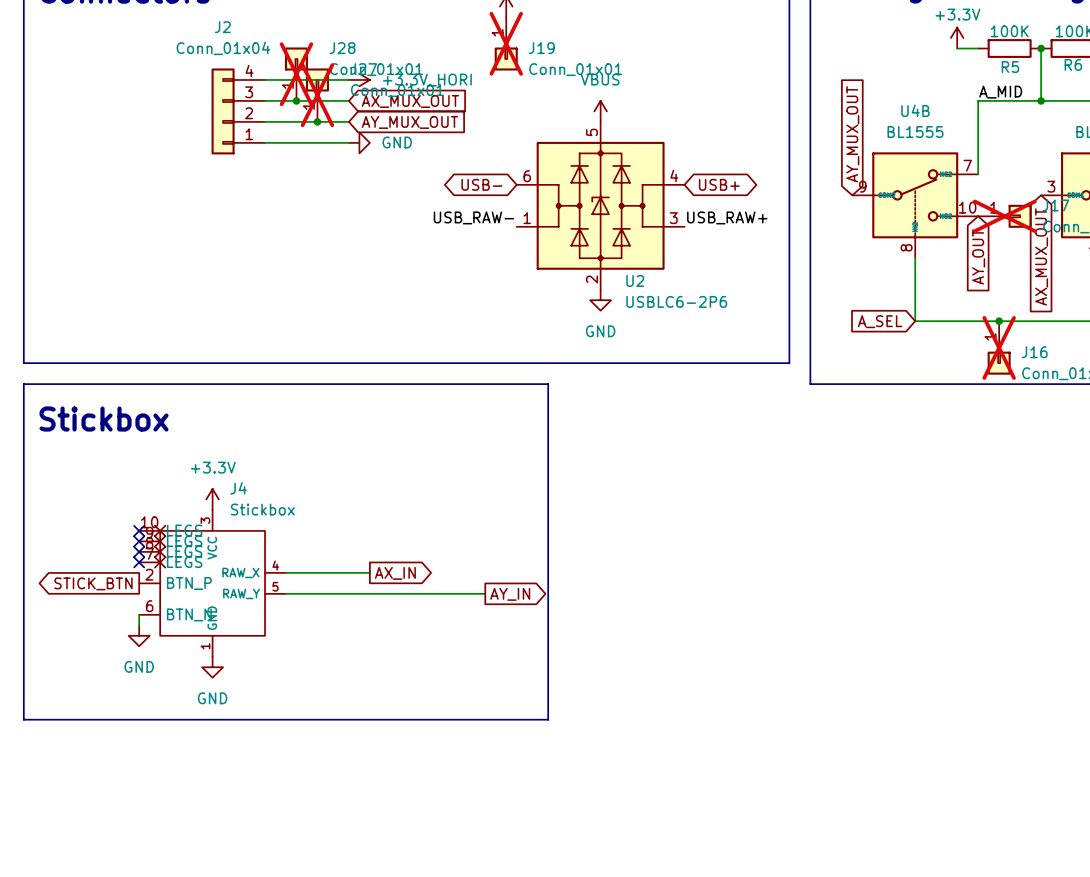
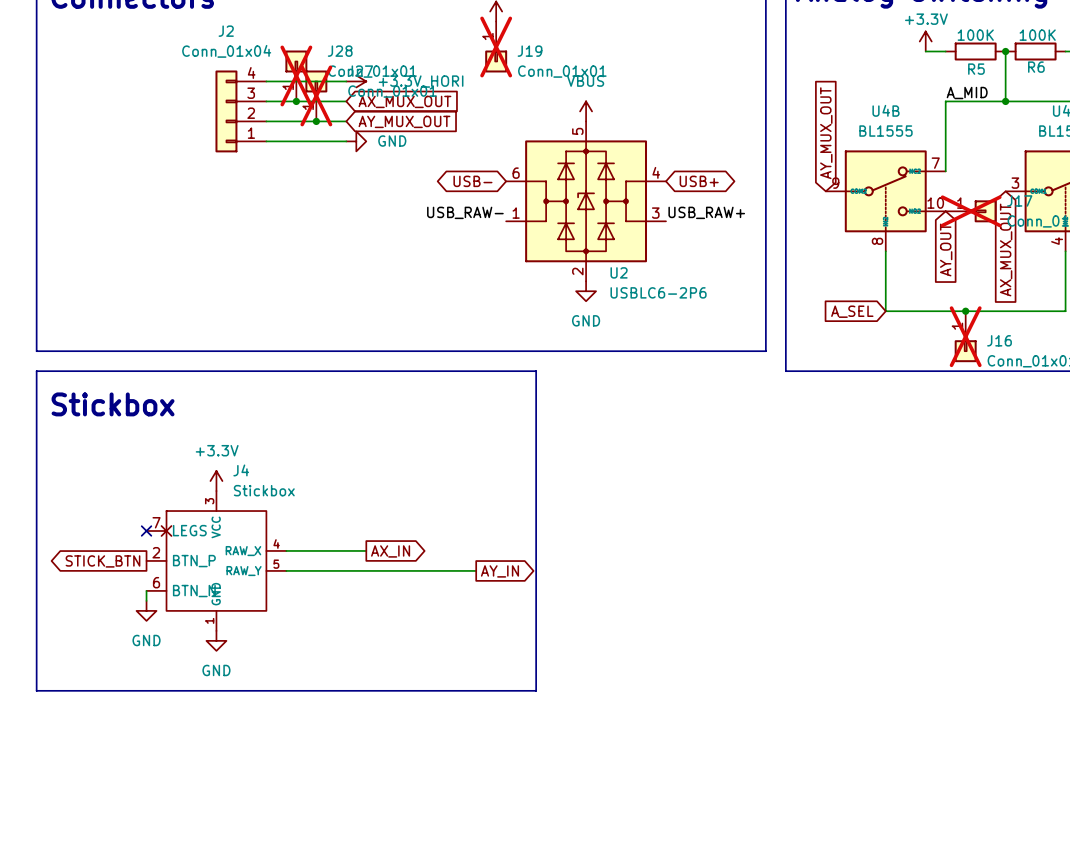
J4 symbol: [139, 509, 287, 657] -> [146, 491, 287, 631]
no-connect mark: (139, 530) -> none
no-connect mark: (139, 541) -> none
no-connect mark: (139, 562) -> none

